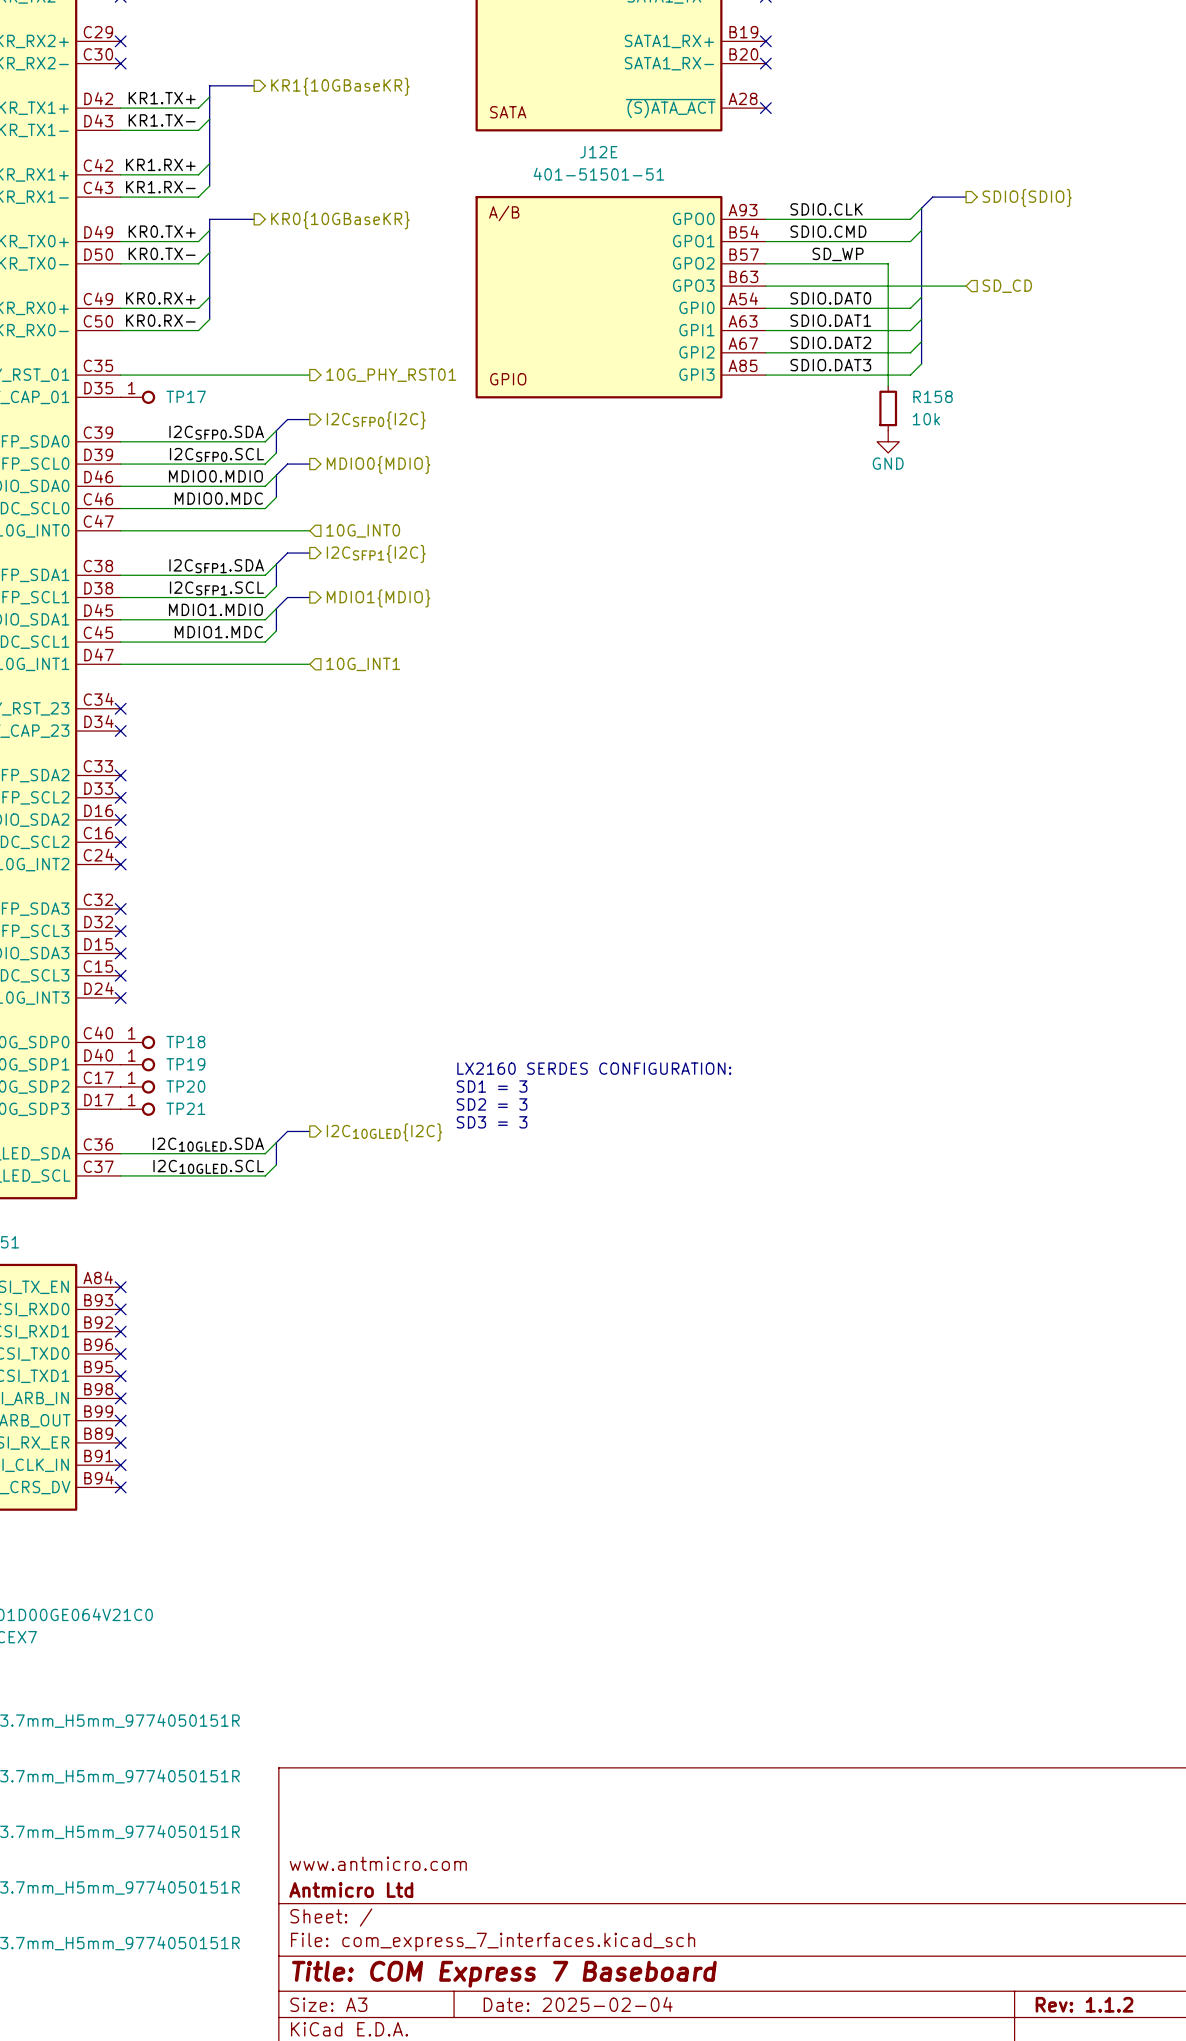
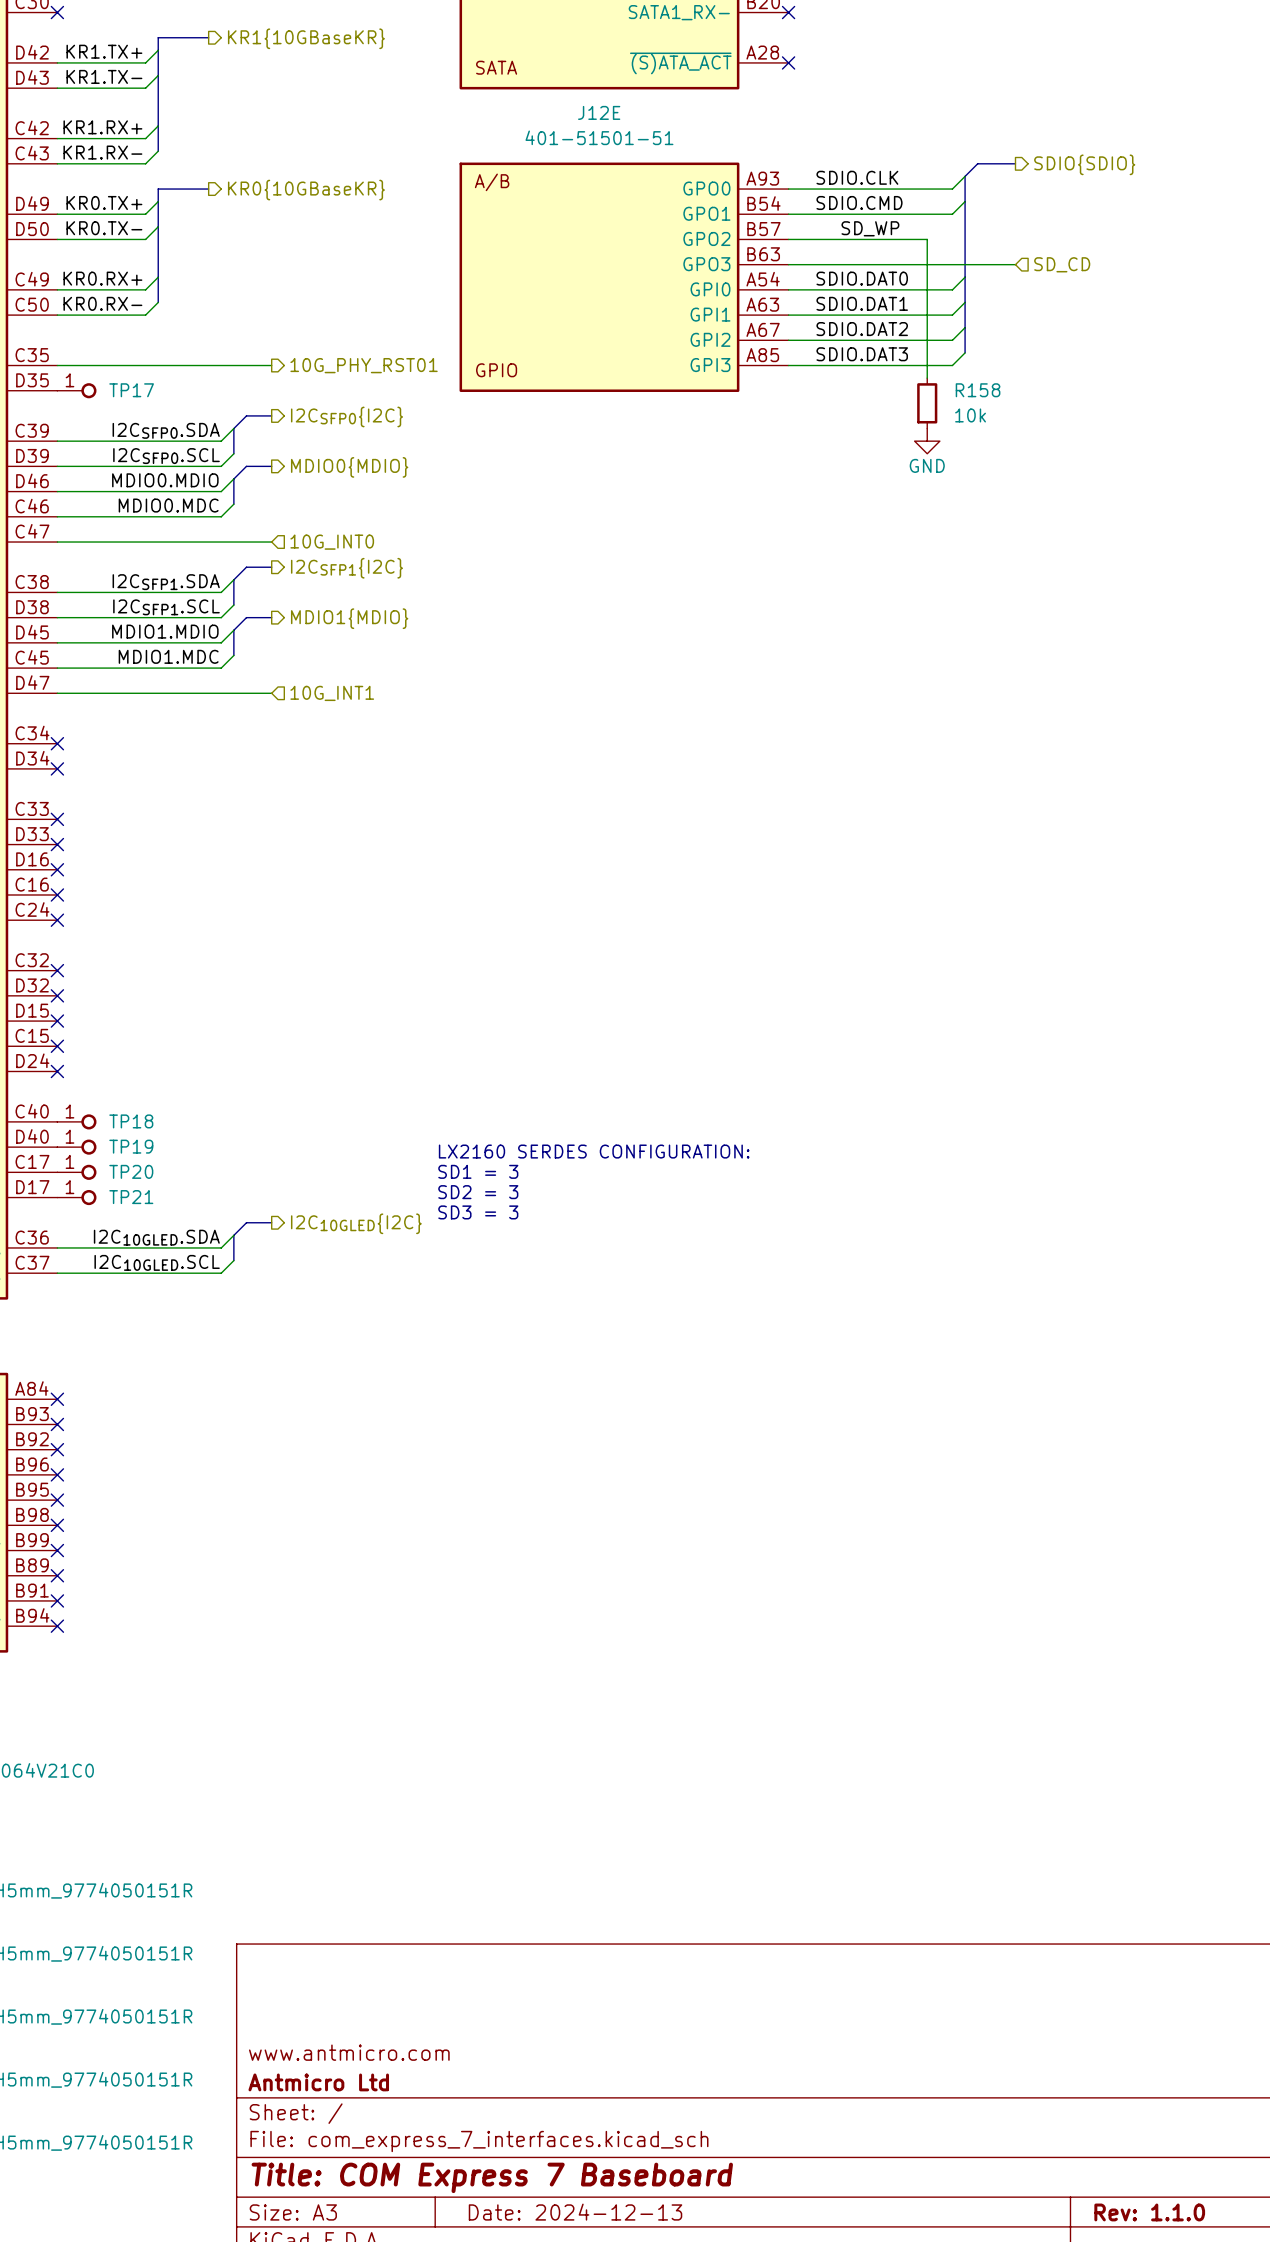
title block: Date: 2025-02-04 (578, 2004) -> Date: 2024-12-13 (575, 2212)
title block: Rev: 1.1.2 (1084, 2004) -> Rev: 1.1.0 (1149, 2212)

